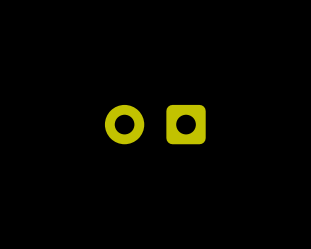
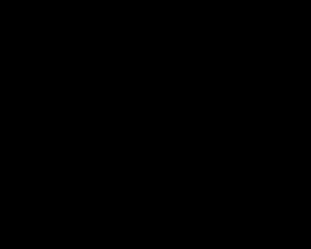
part: (155, 124) -> none

